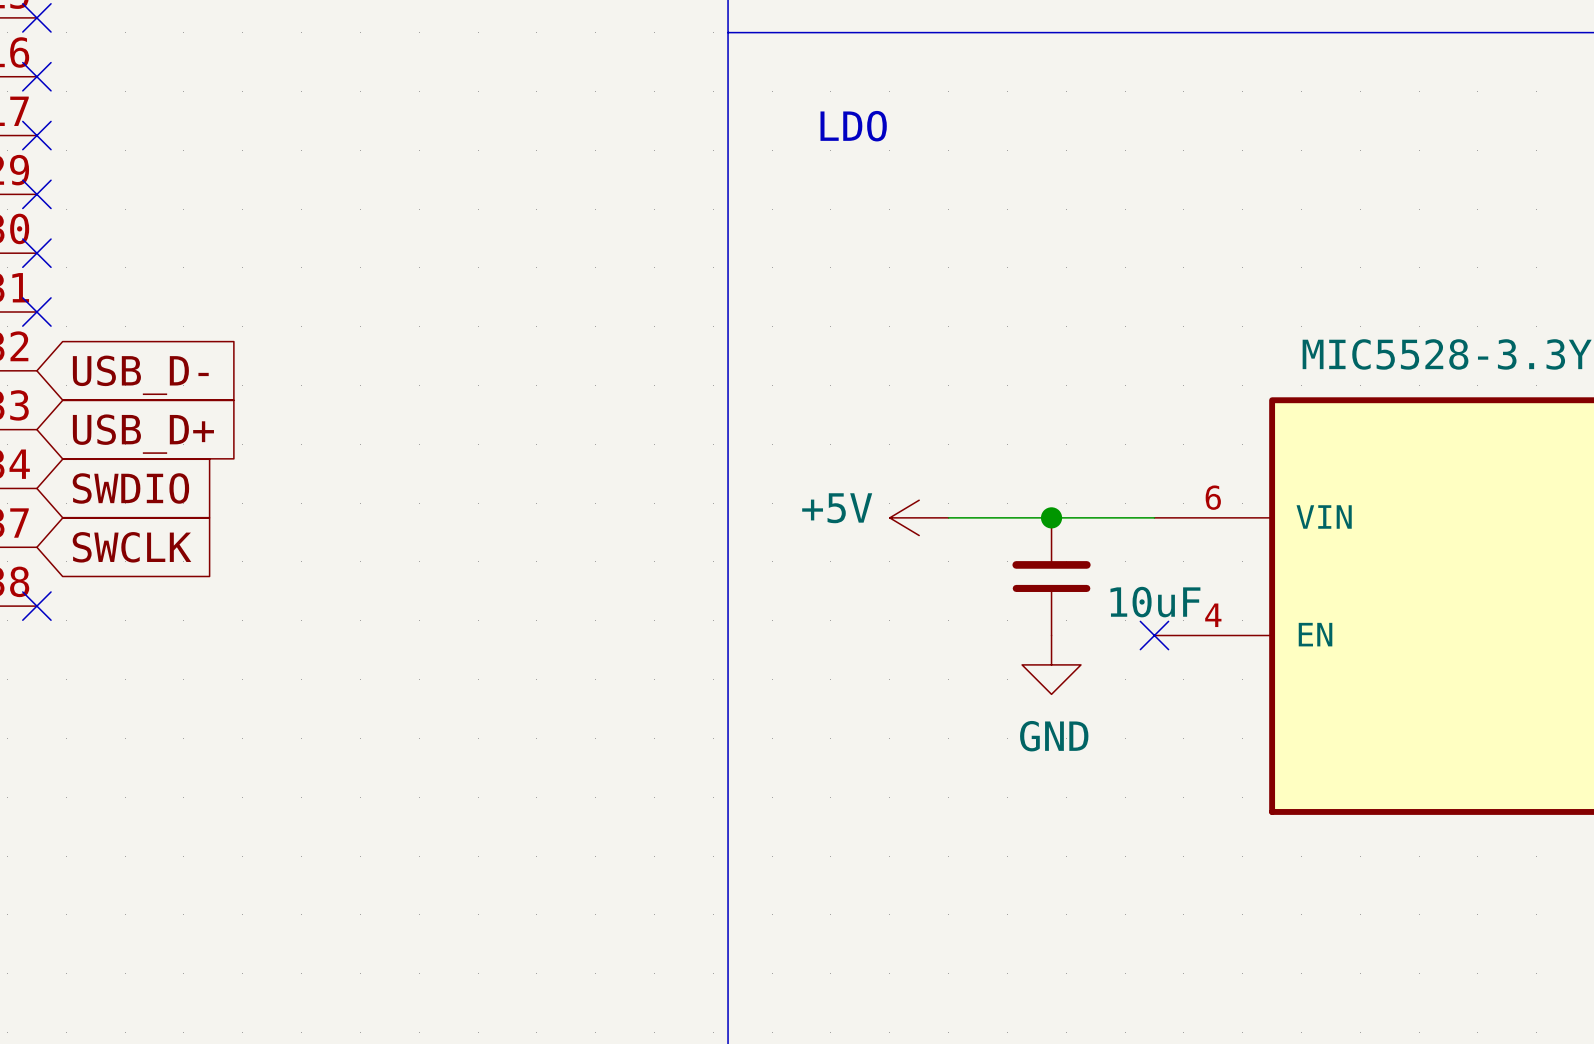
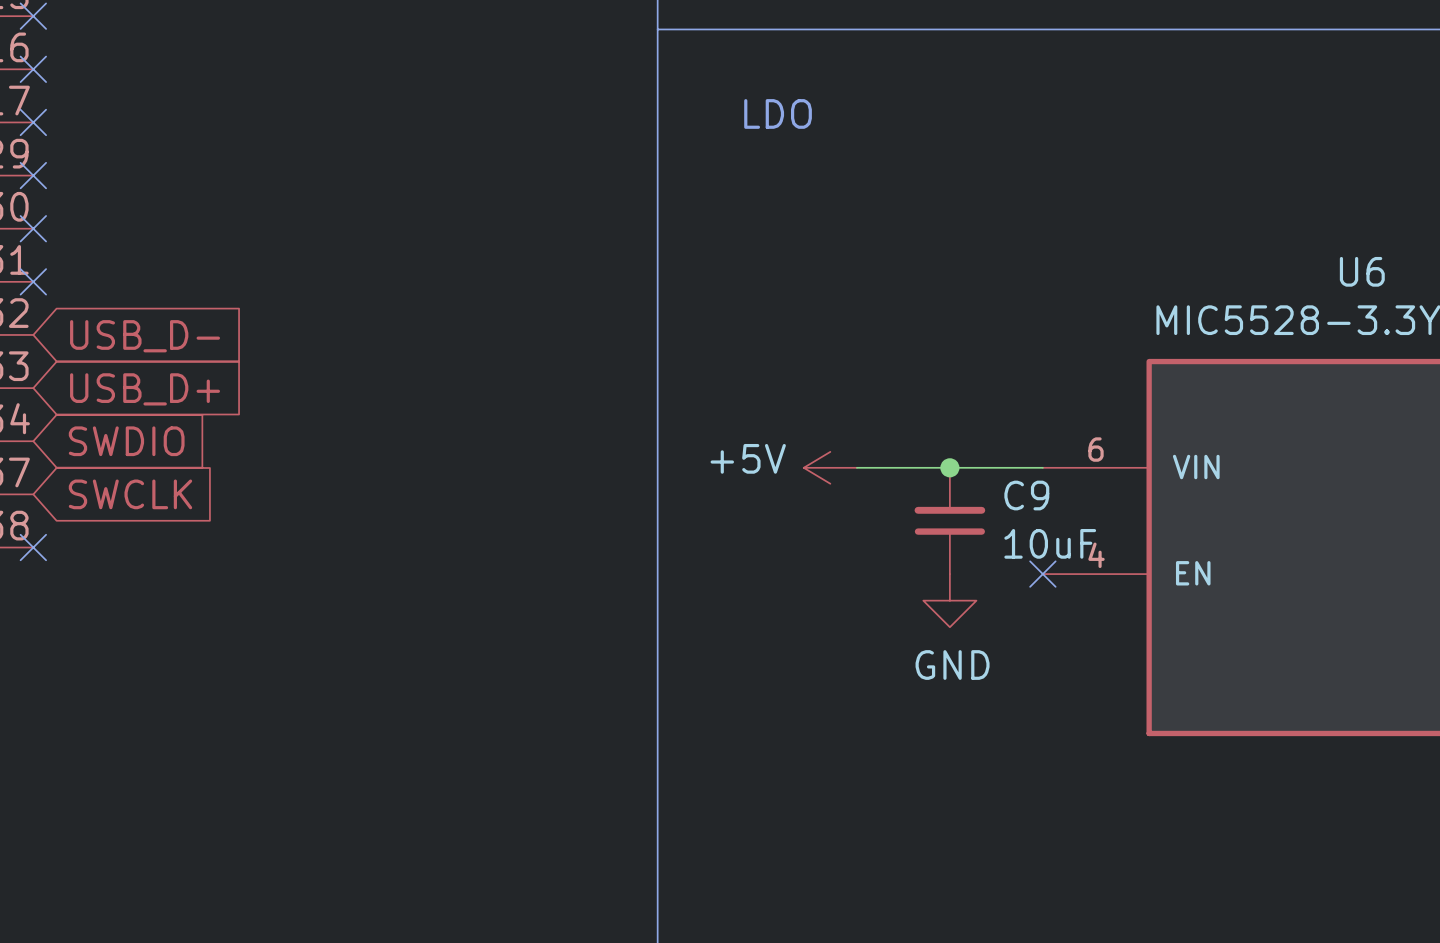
U6 name: none -> U6 (1362, 271)
C9 name: none -> C9 (1026, 495)

